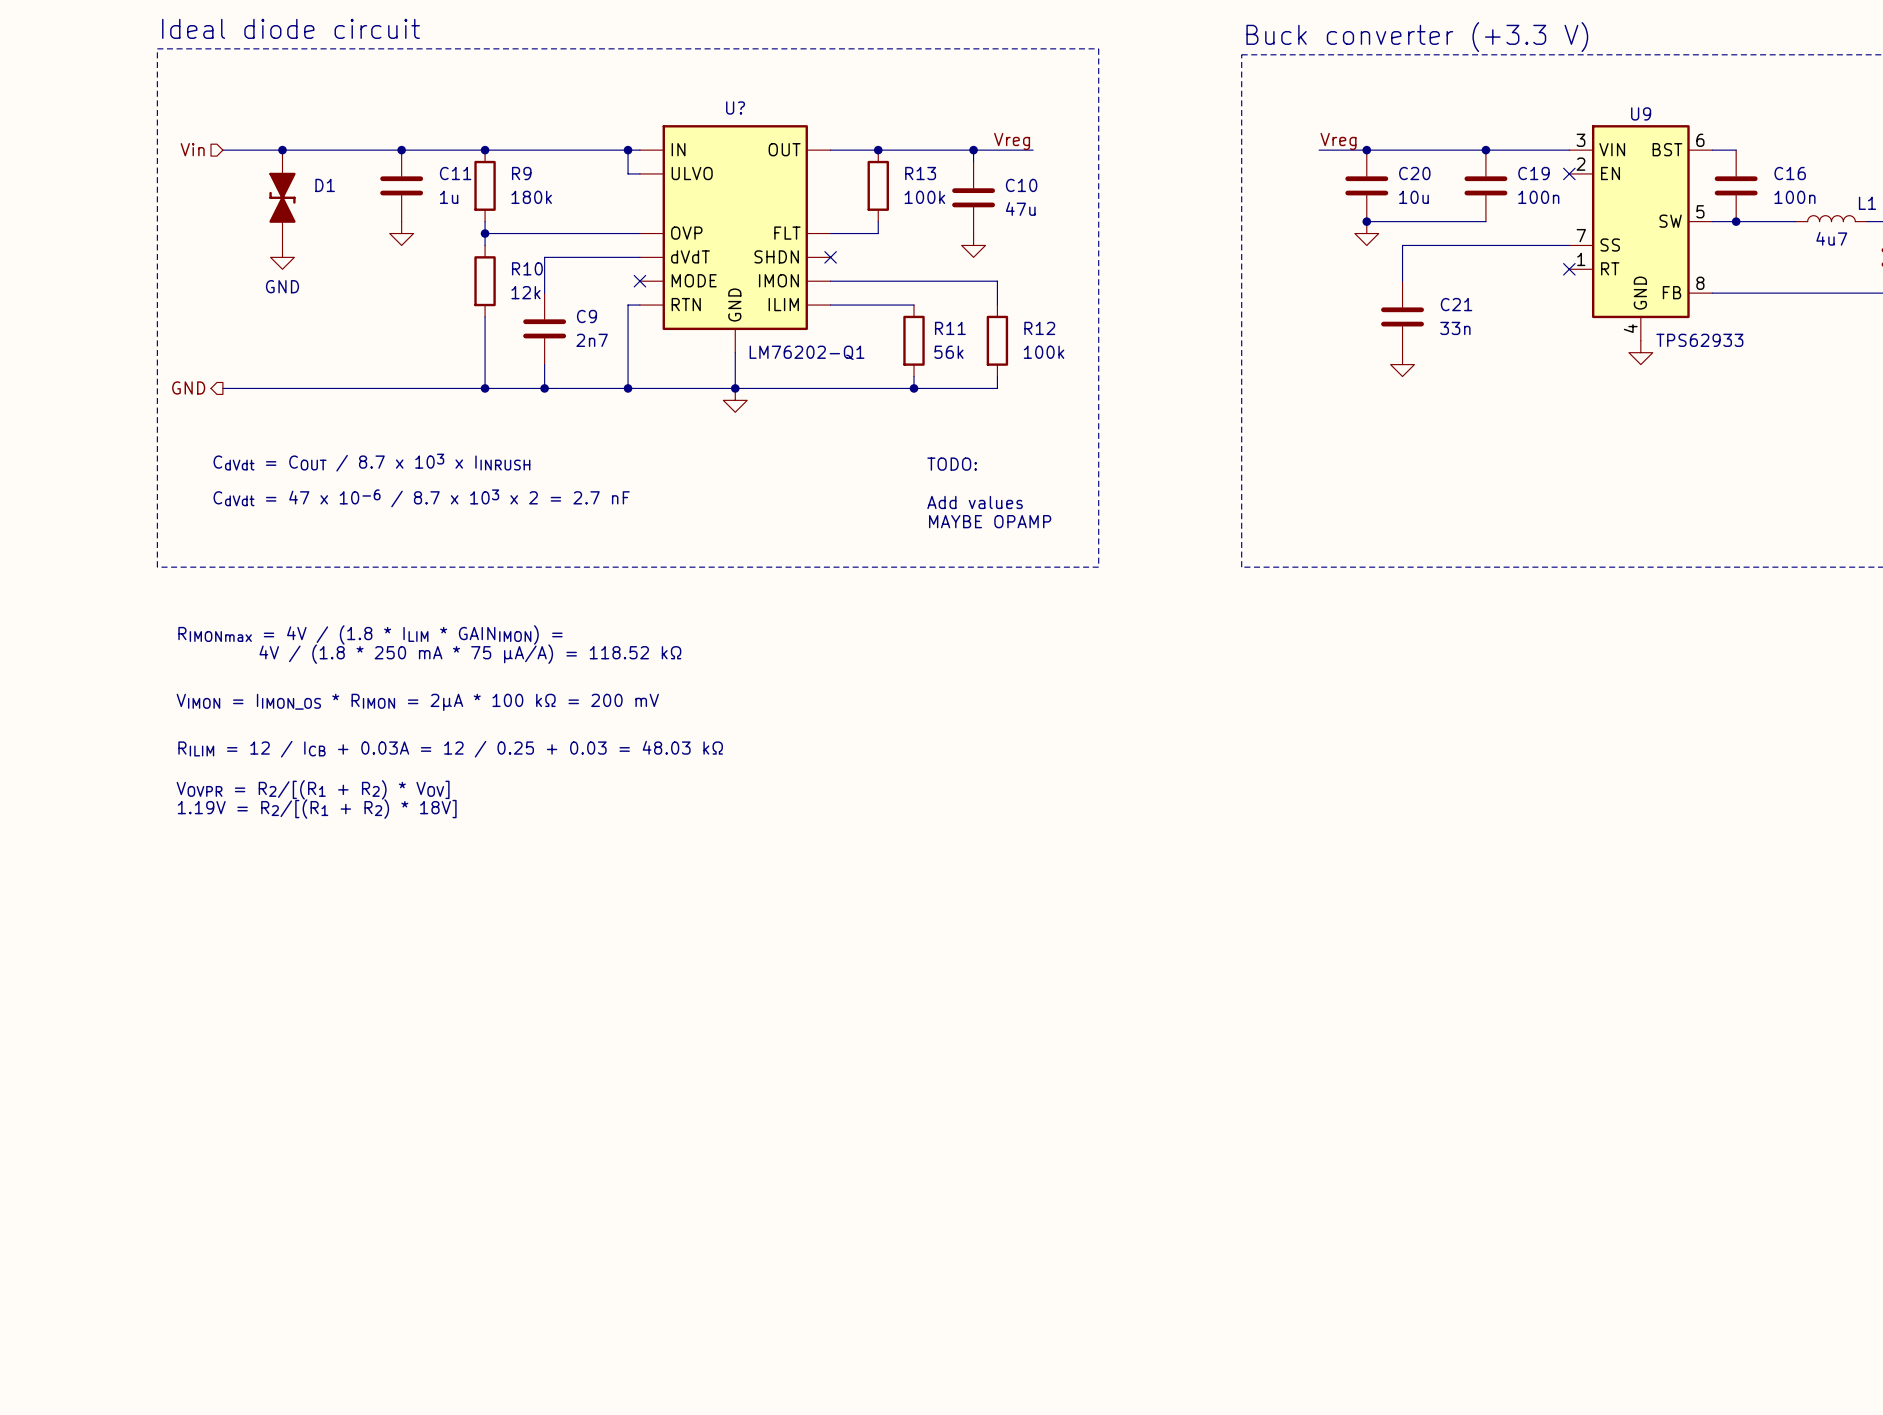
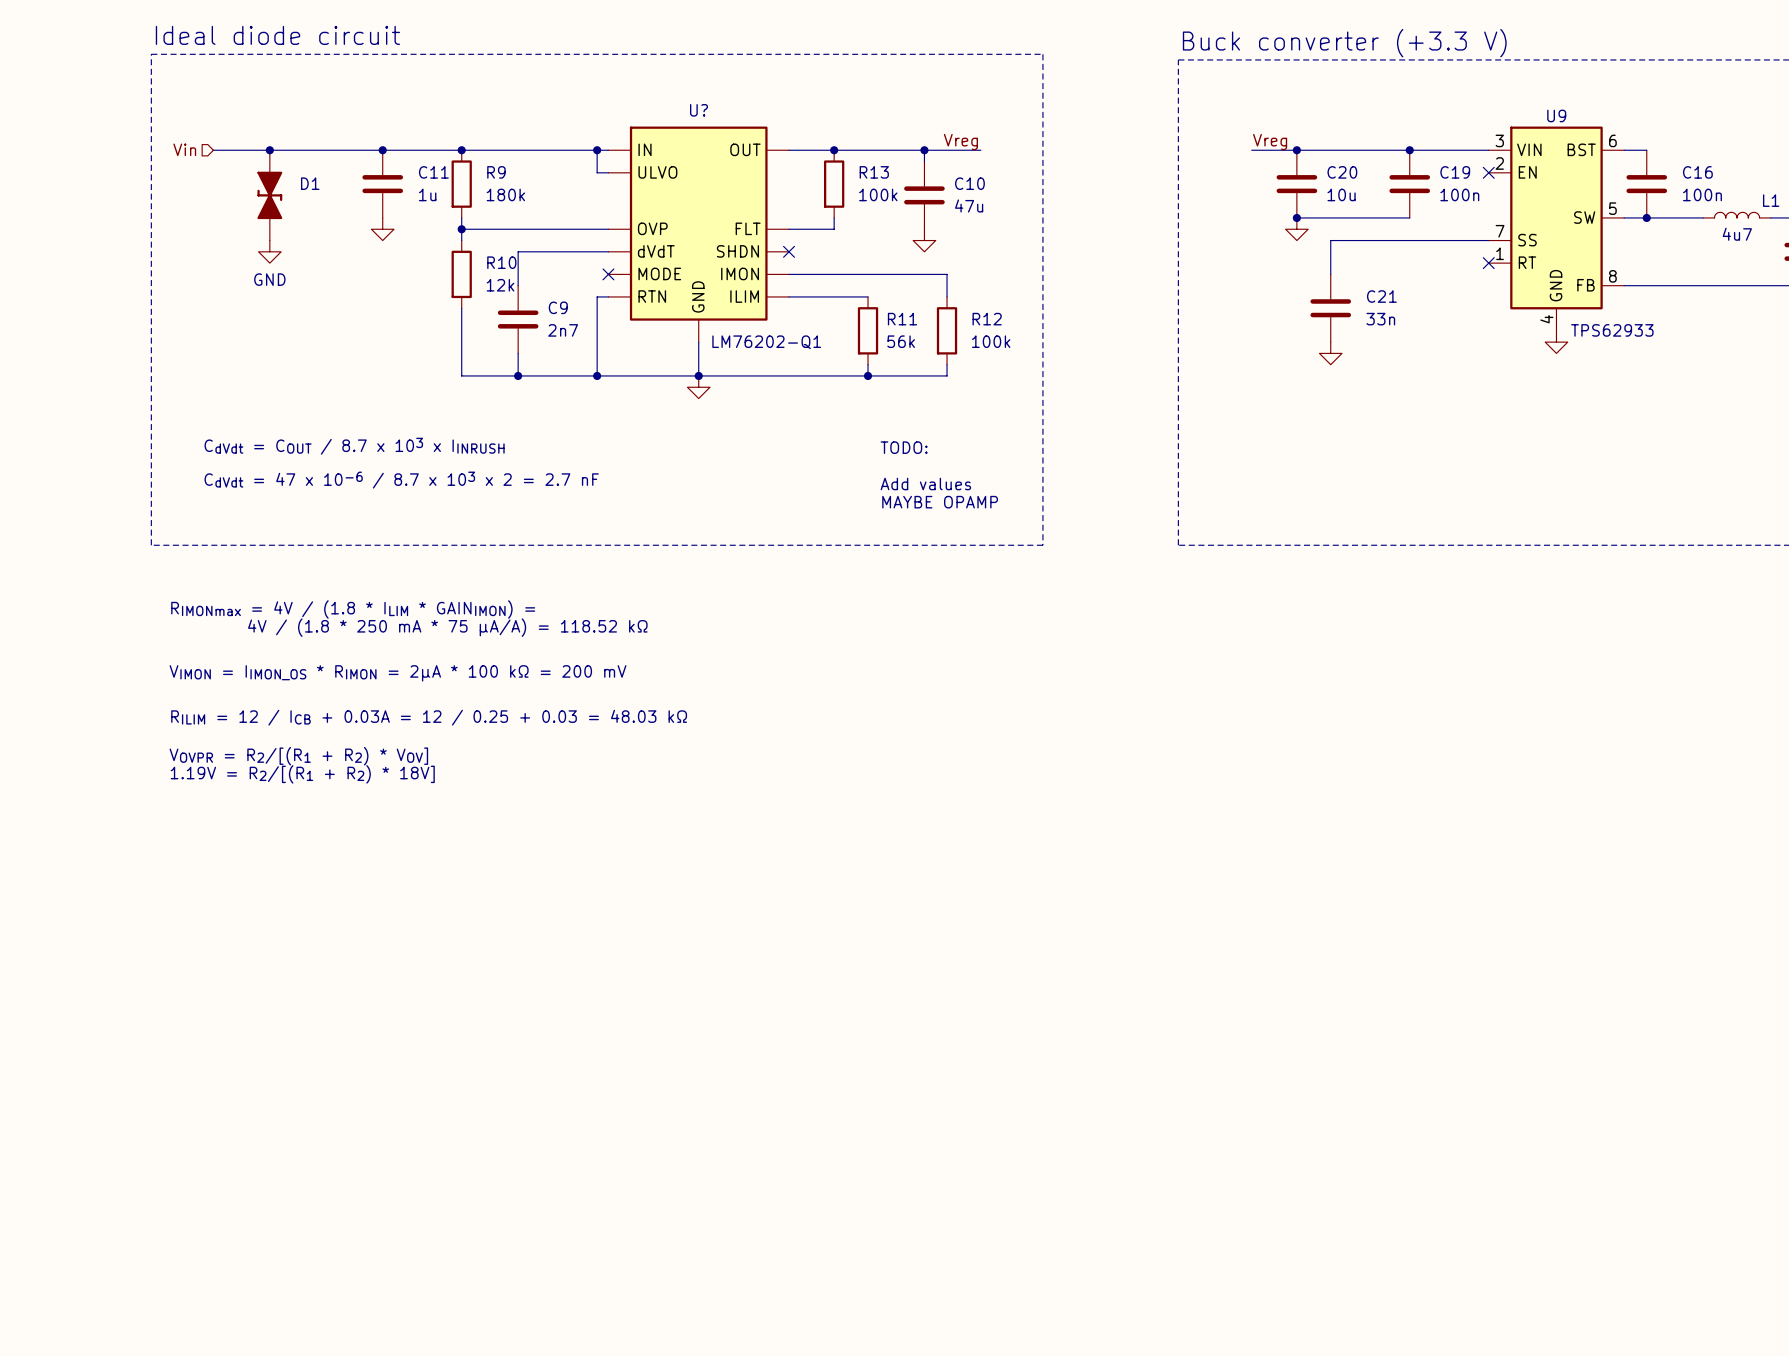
hierarchical label: GND (188, 387) -> none
wire: (222, 388) (485, 388) -> none
junction: (485, 388) -> none

